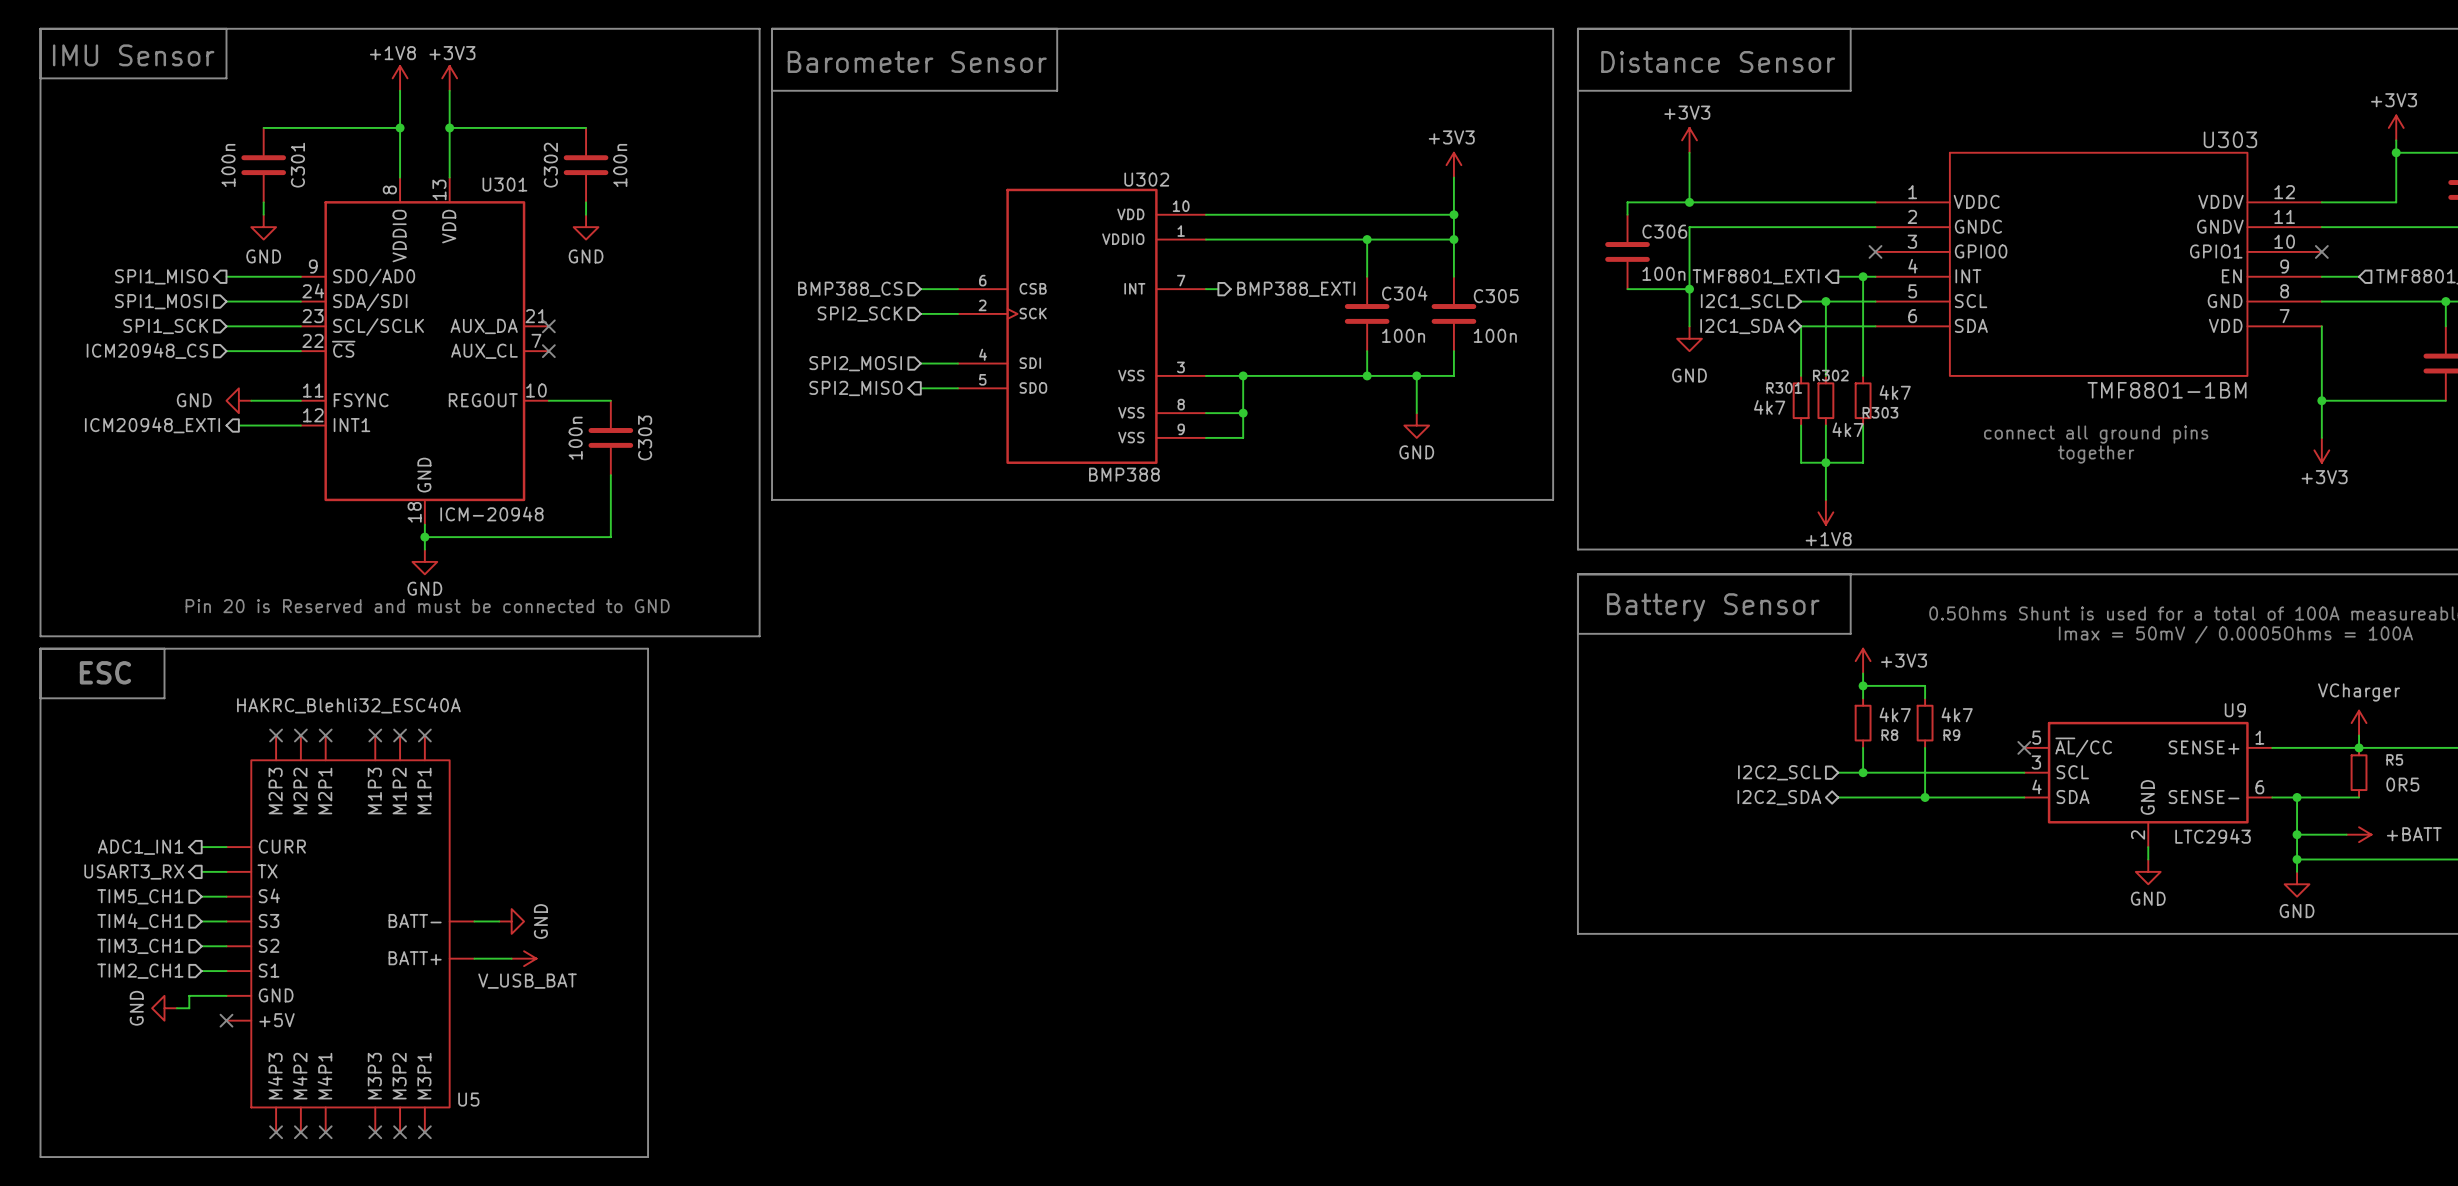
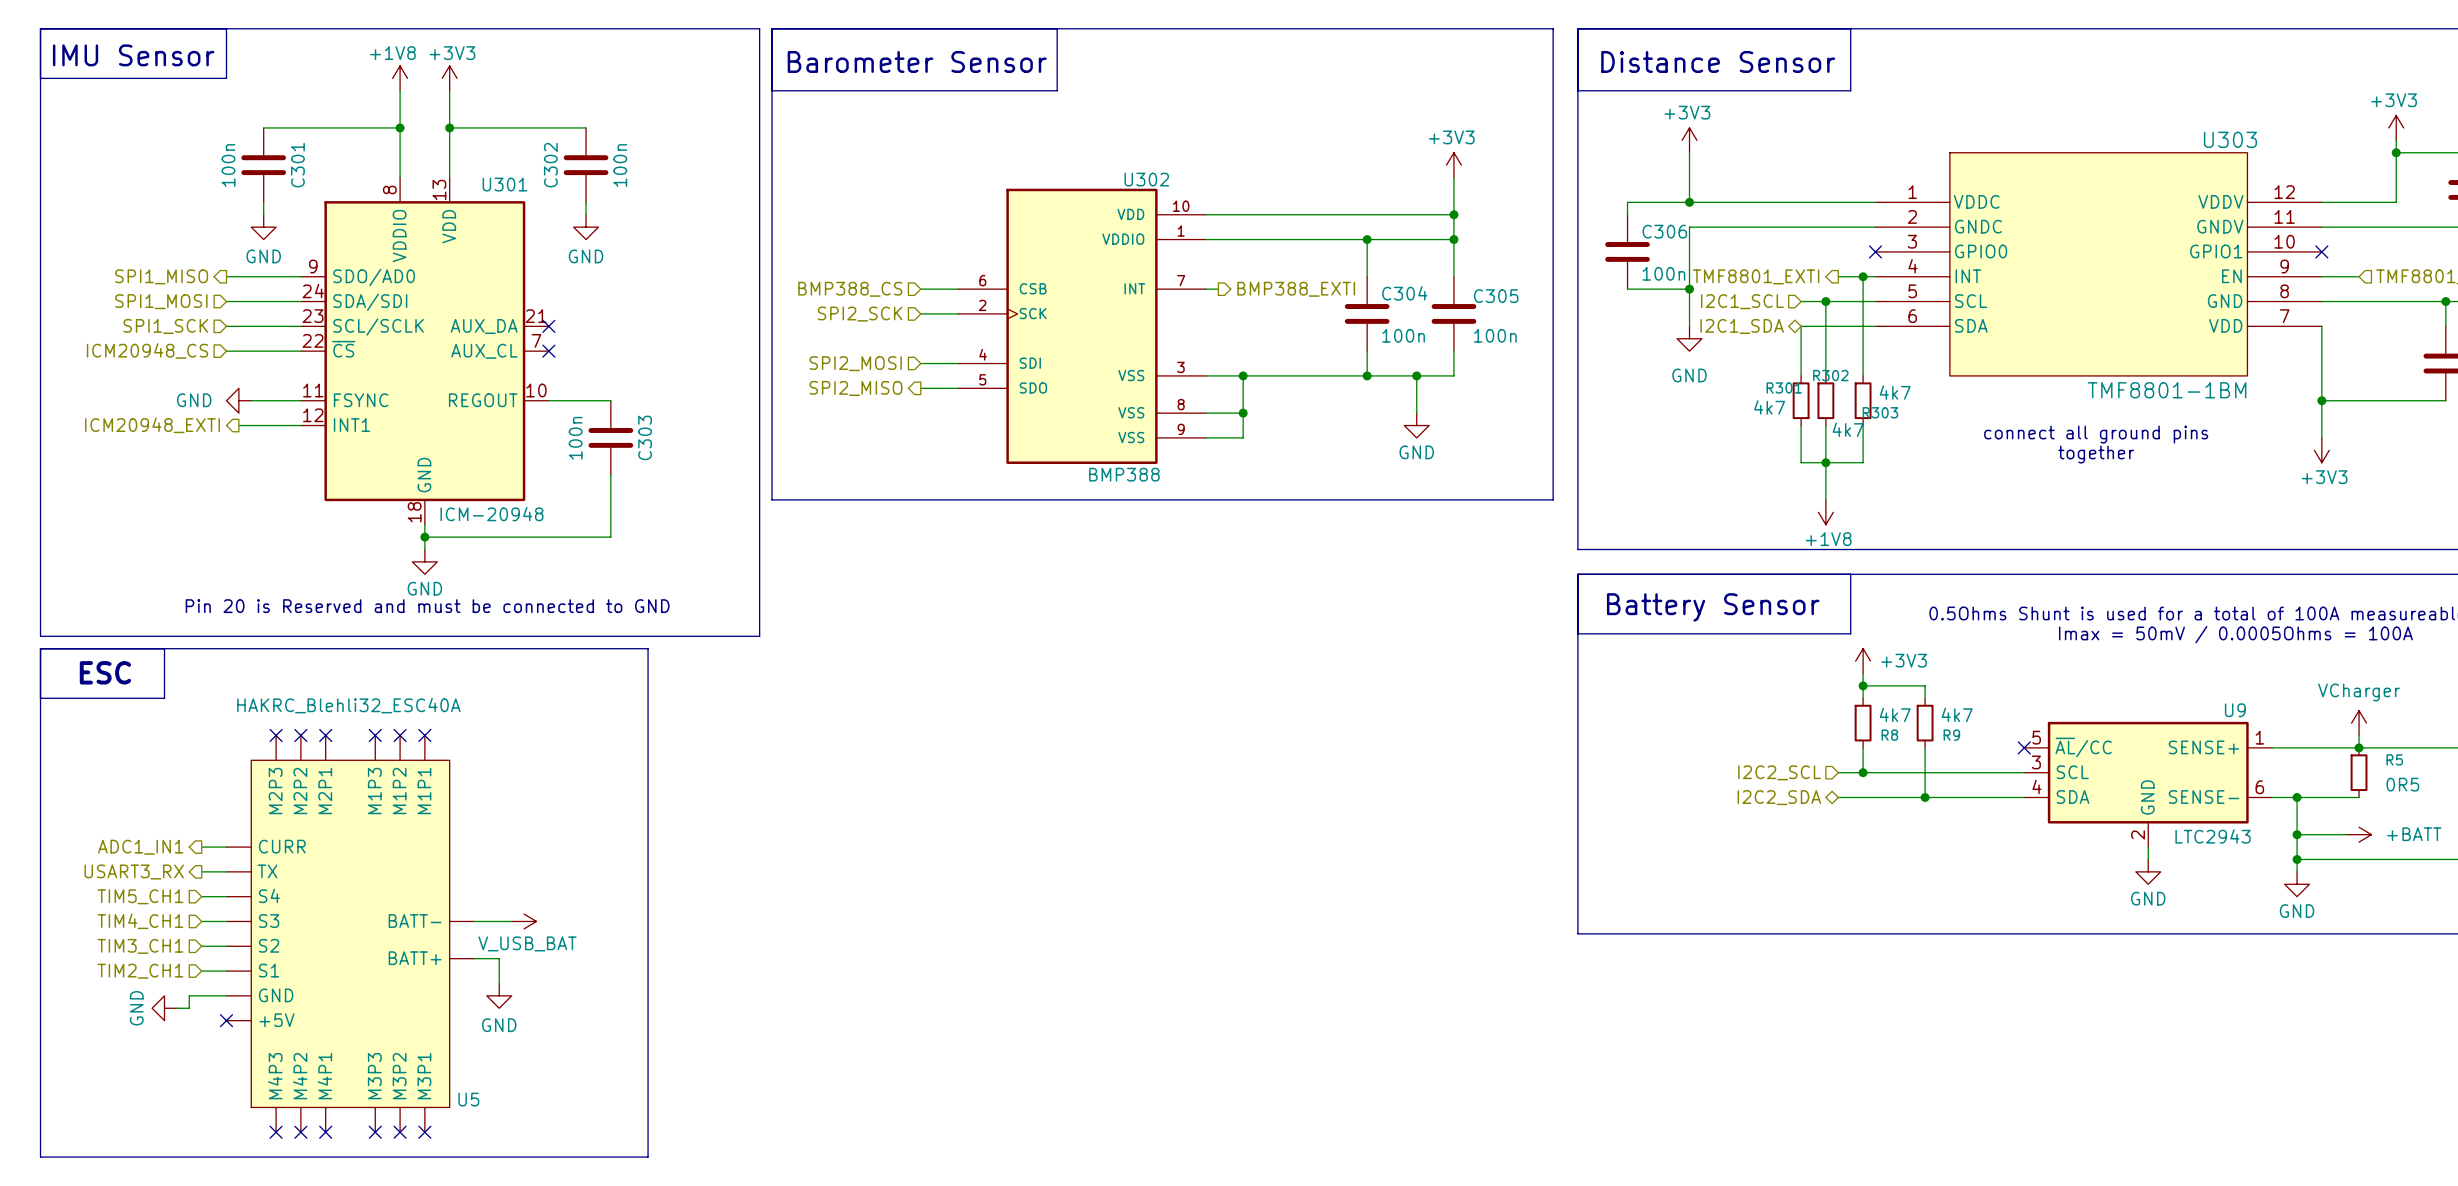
power symbol rotation: 0° (511, 921) -> 90° clockwise (499, 995)
power symbol position: GND (511, 921) -> GND (499, 995)
wire: (499, 958) (511, 958) -> (499, 958) (499, 983)
power symbol position: V_USB_BAT (524, 958) -> V_USB_BAT (524, 921)

